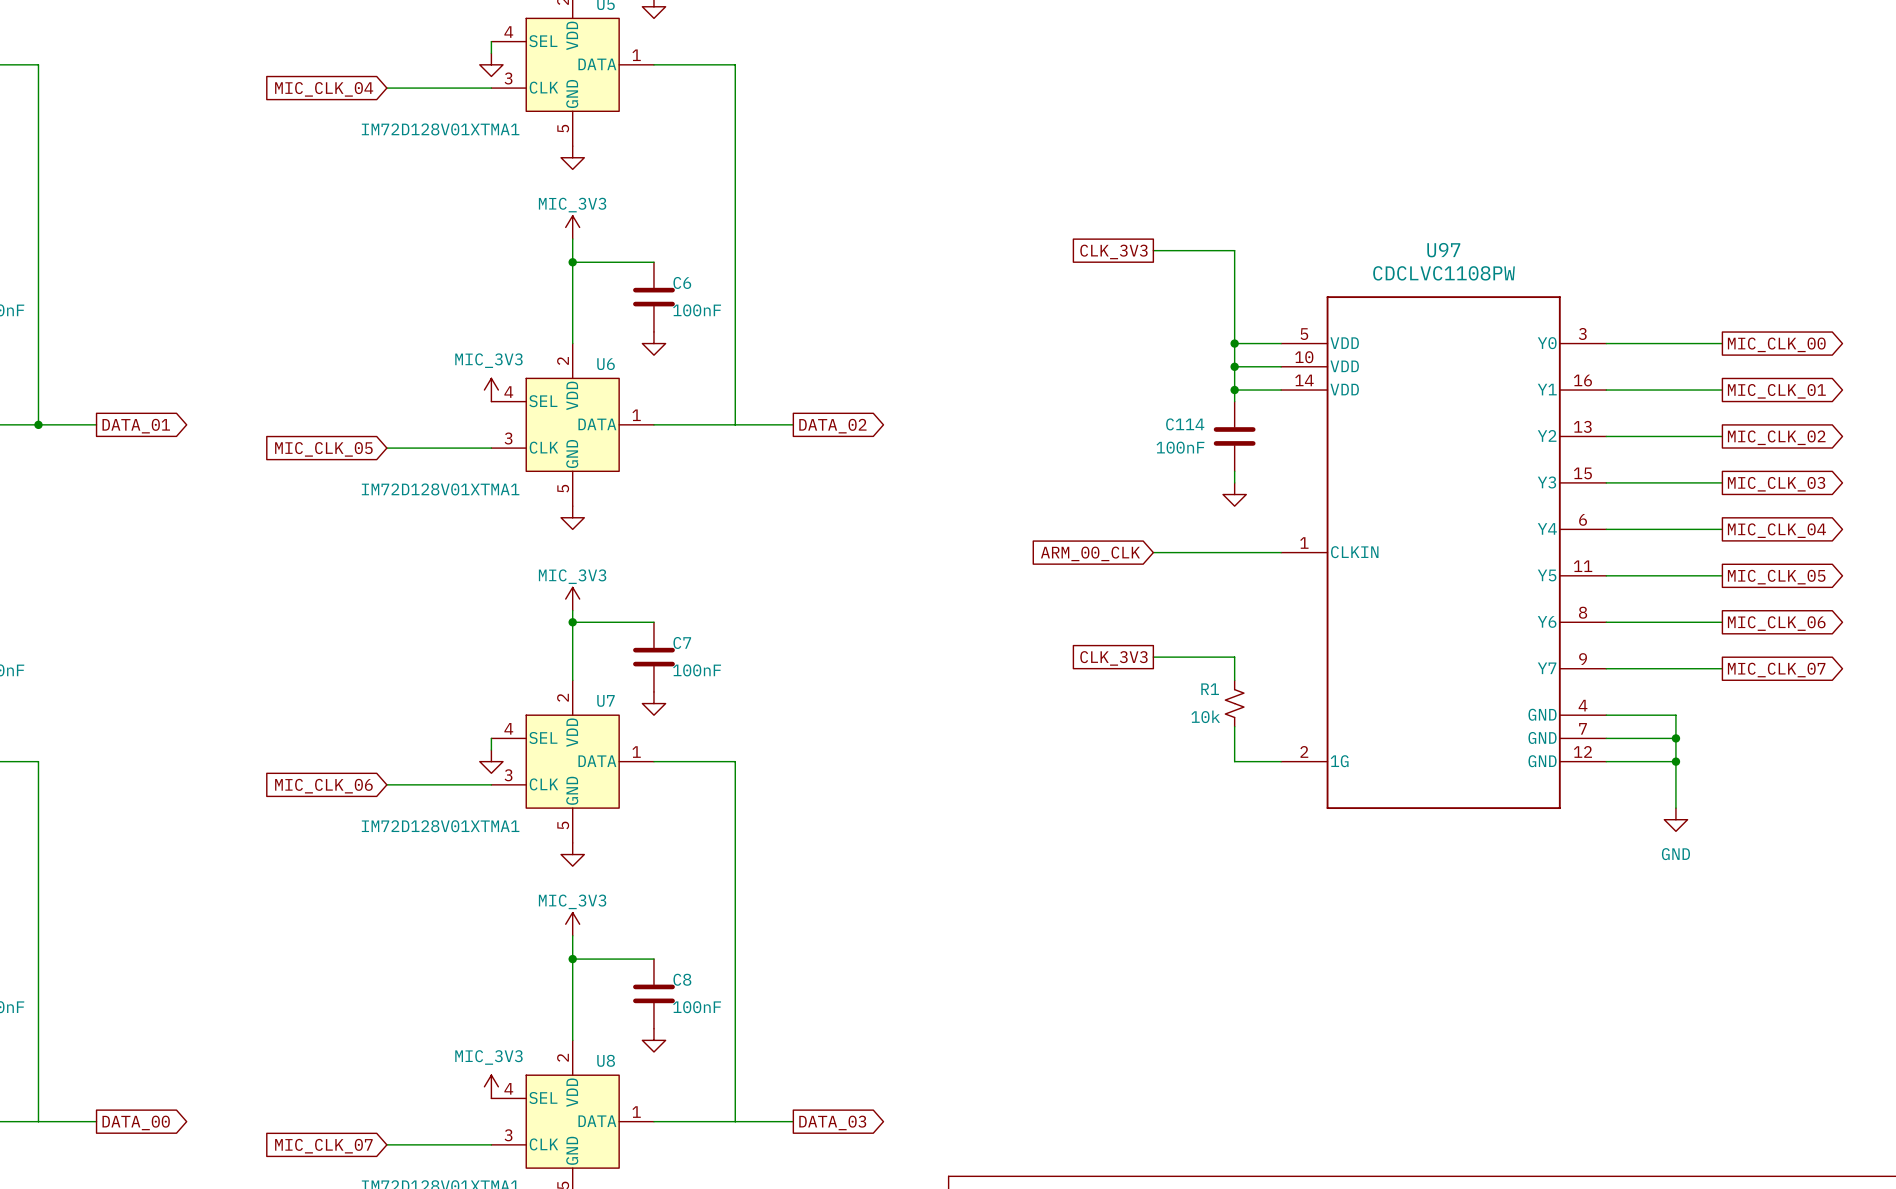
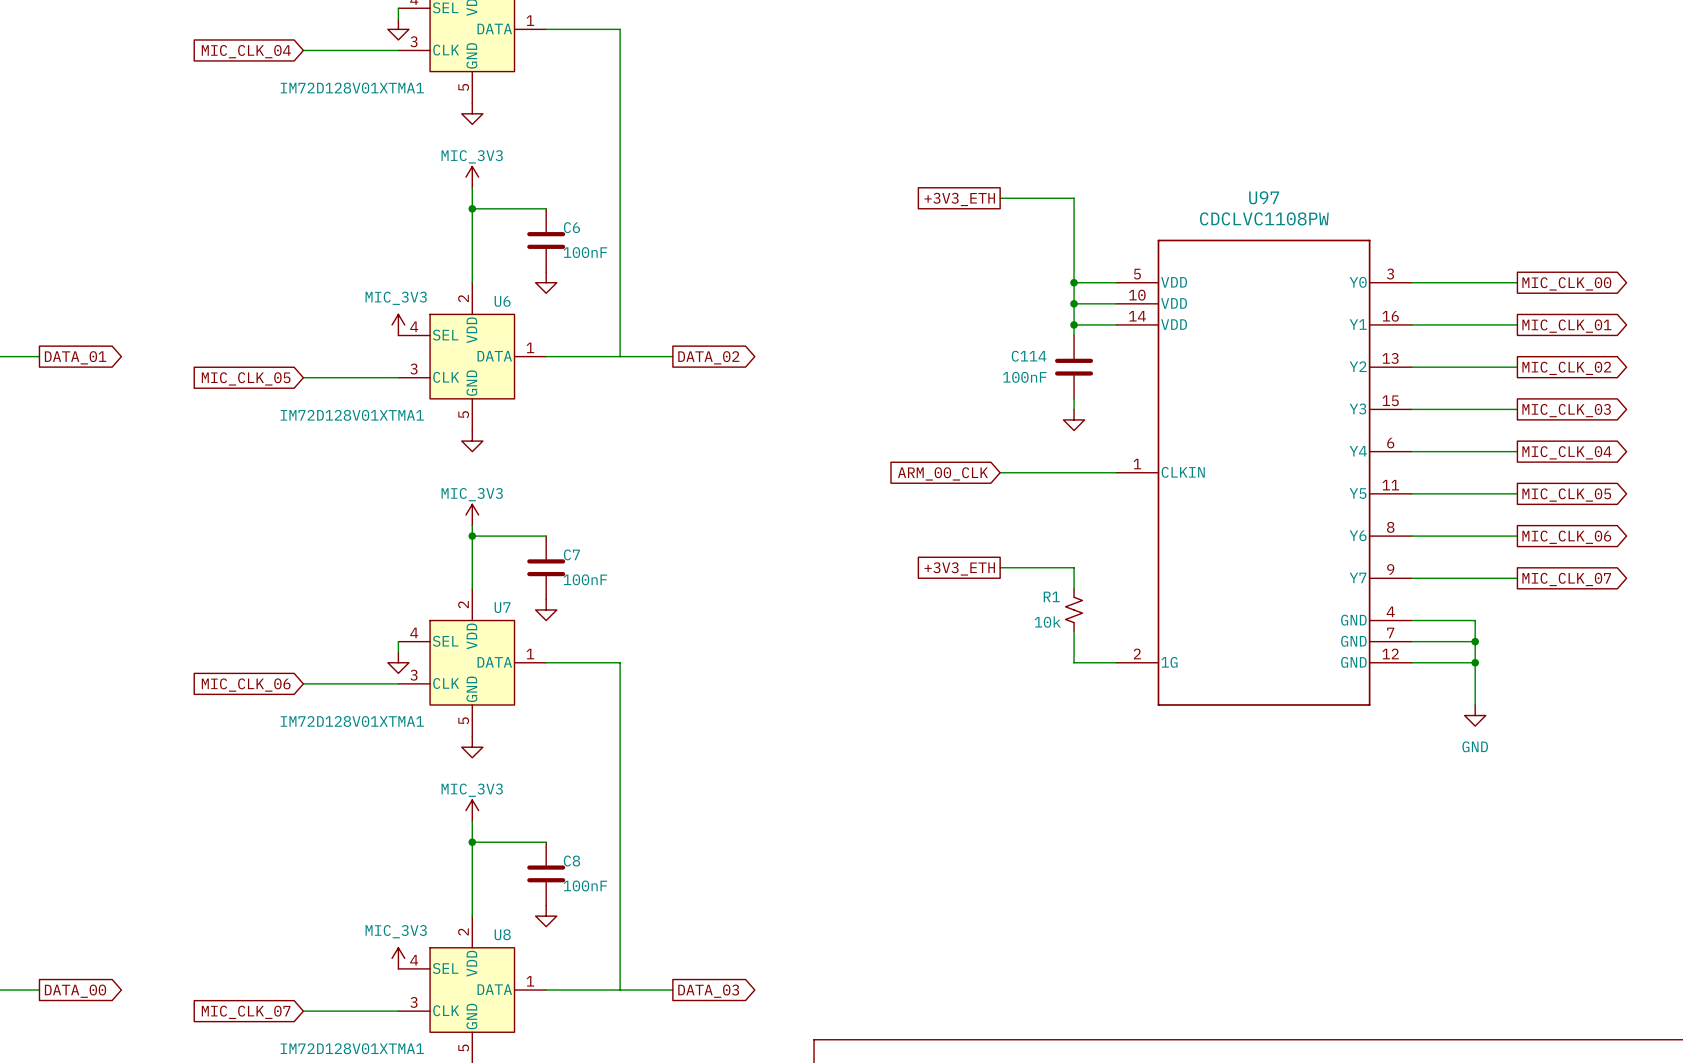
global label: CLK_3V3 (1113, 251) -> +3V3_ETH (959, 199)
global label: CLK_3V3 (1113, 658) -> +3V3_ETH (959, 568)

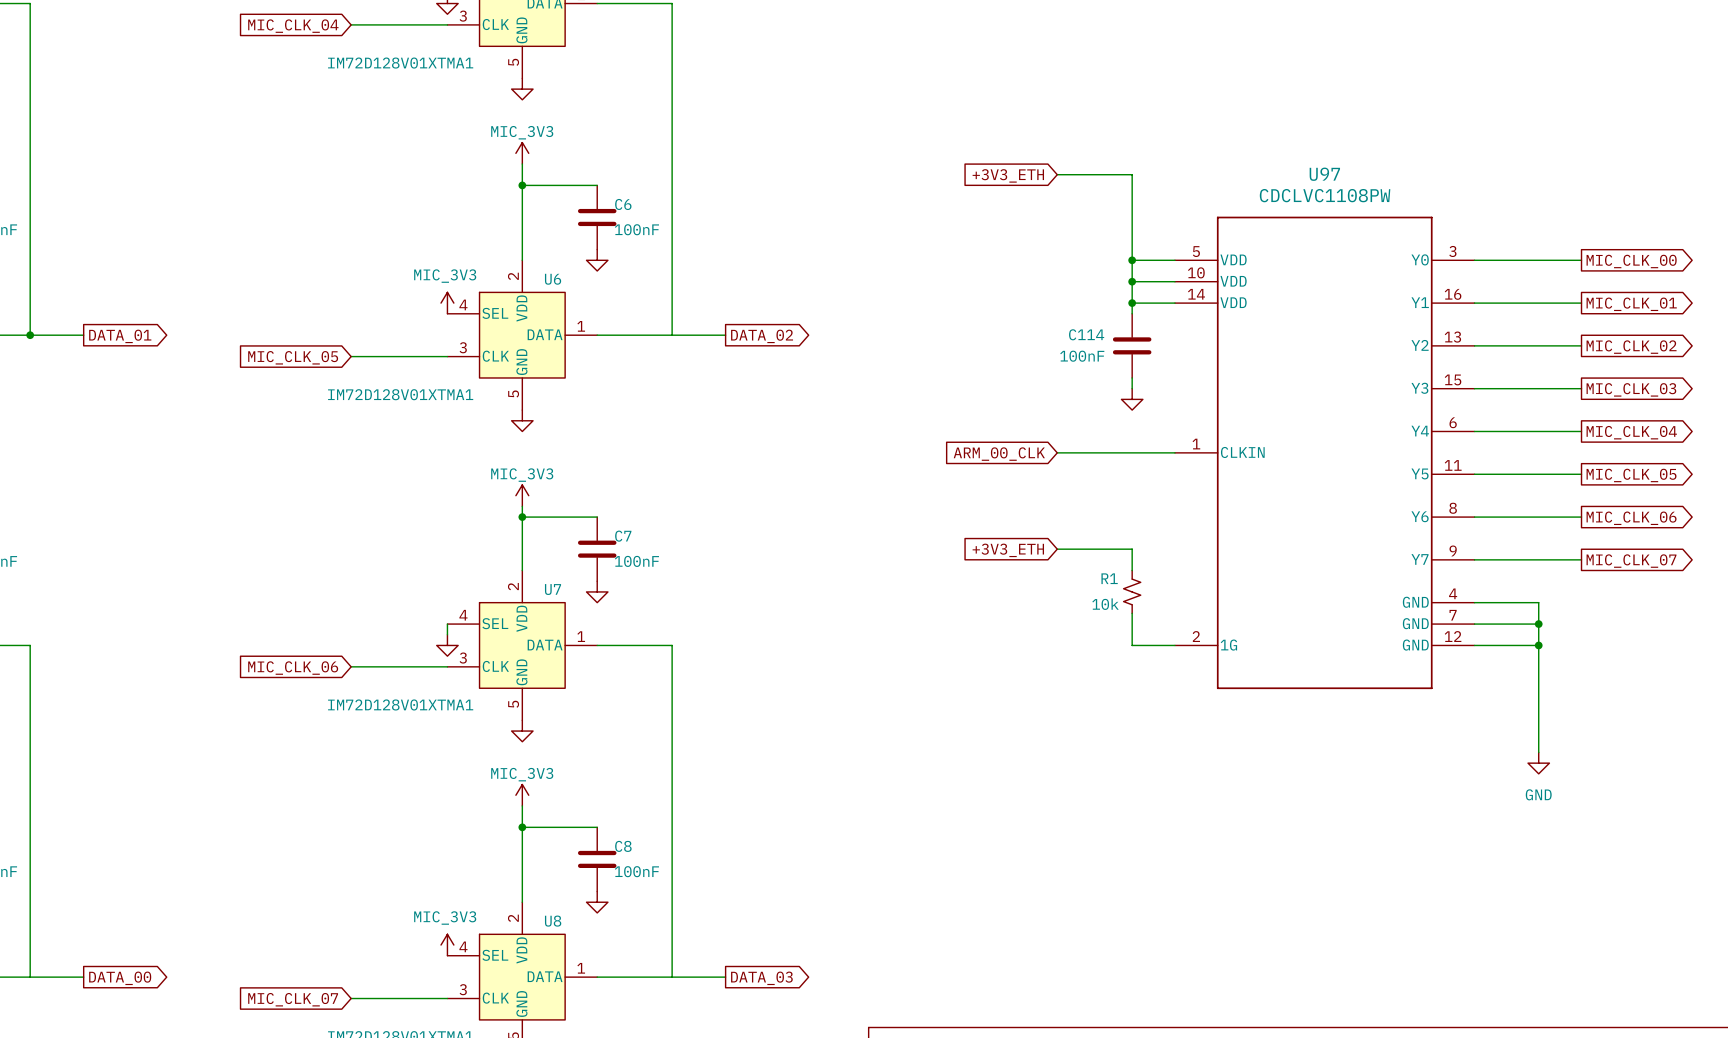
global label shape: passive (959, 199) -> input (1008, 175)
global label shape: passive (959, 568) -> input (1008, 550)
wire: none -> (1538, 688) (1538, 752)
power symbol position: GND (1475, 715) -> GND (1538, 763)

